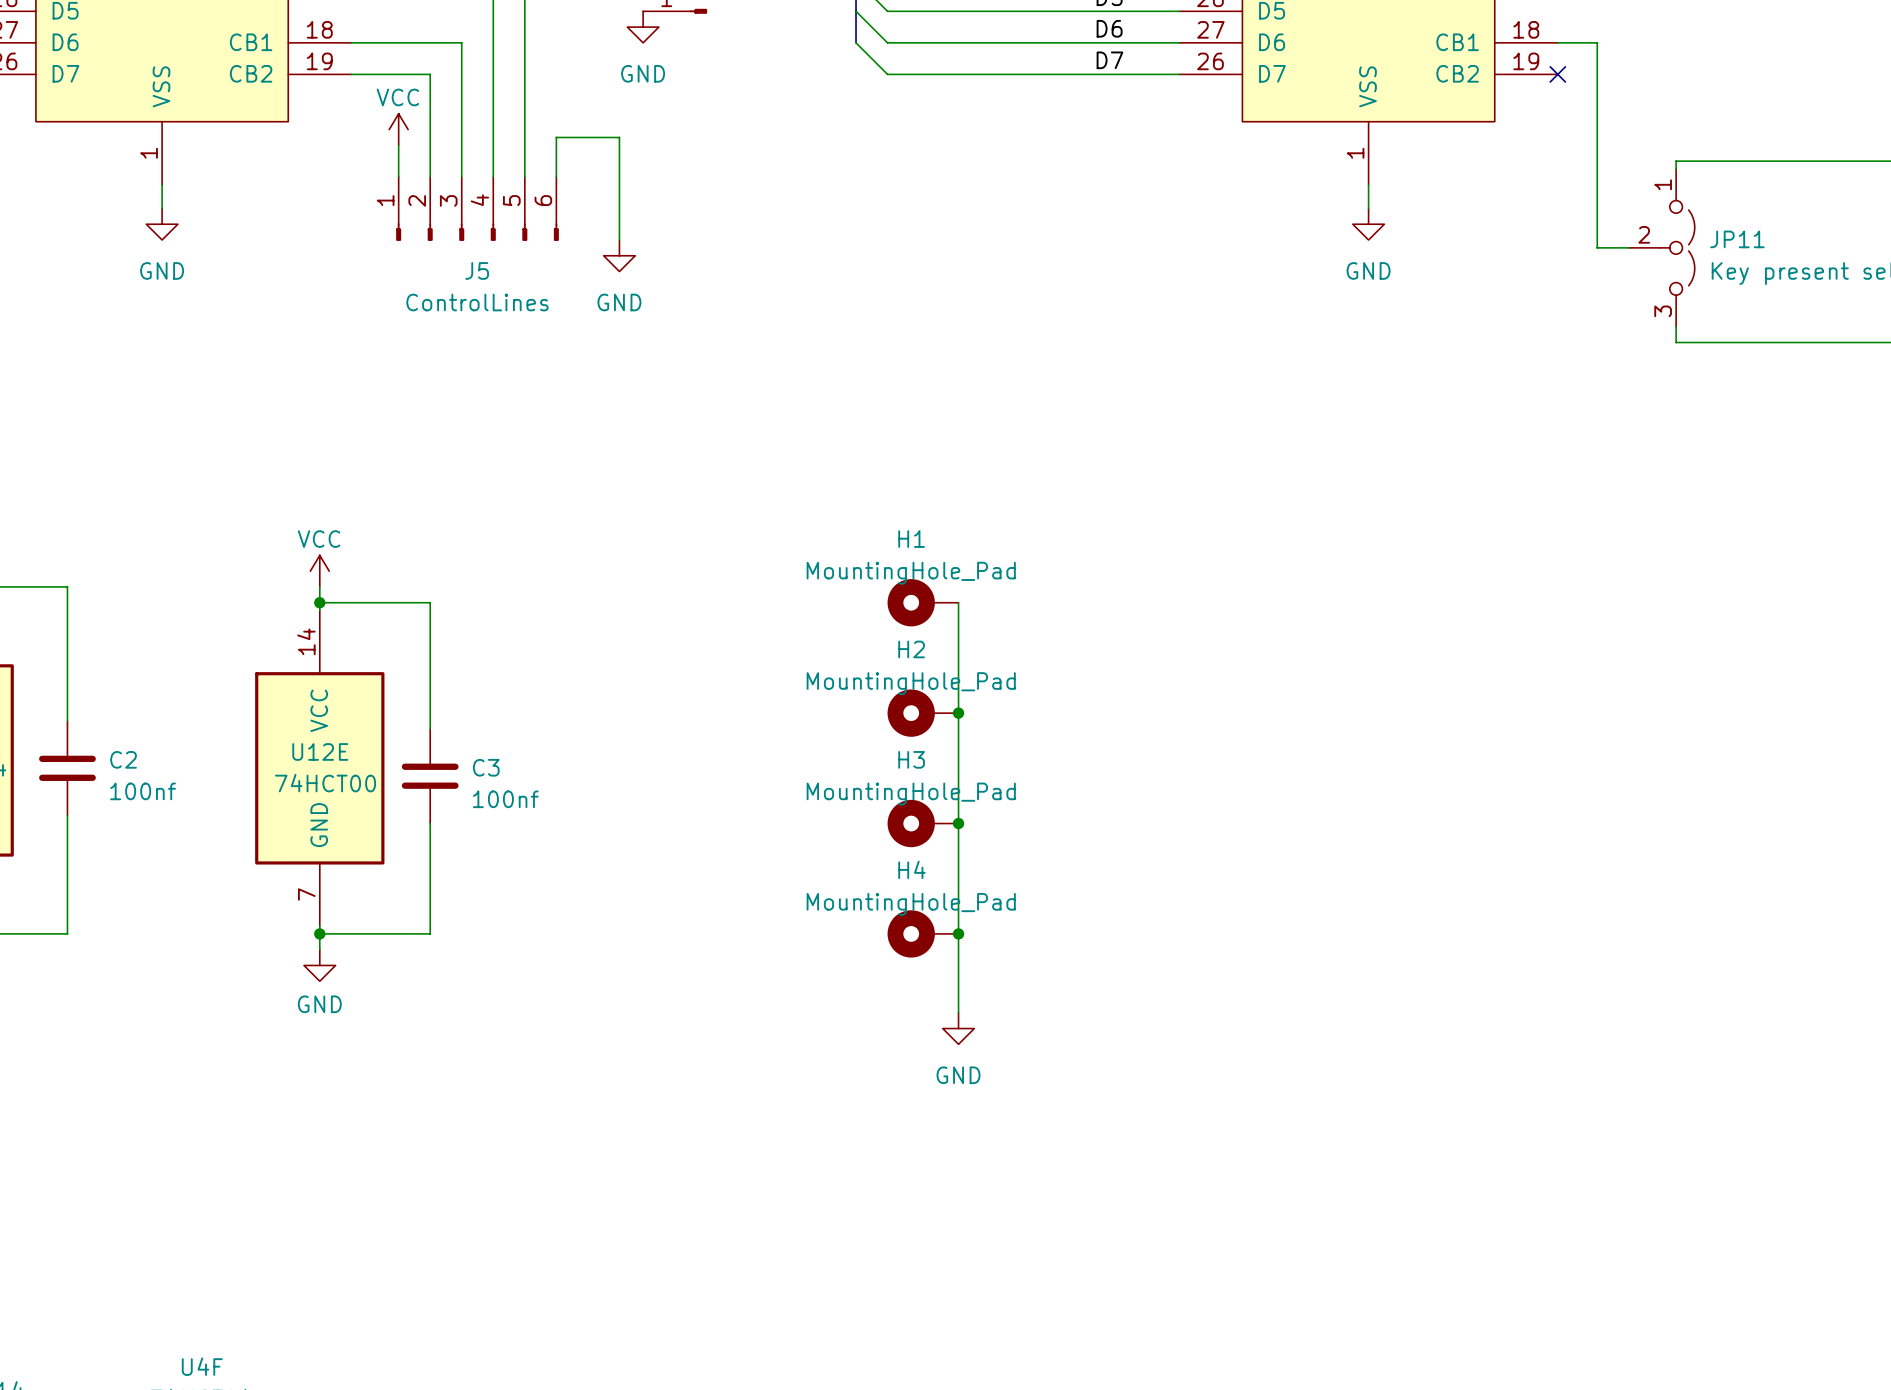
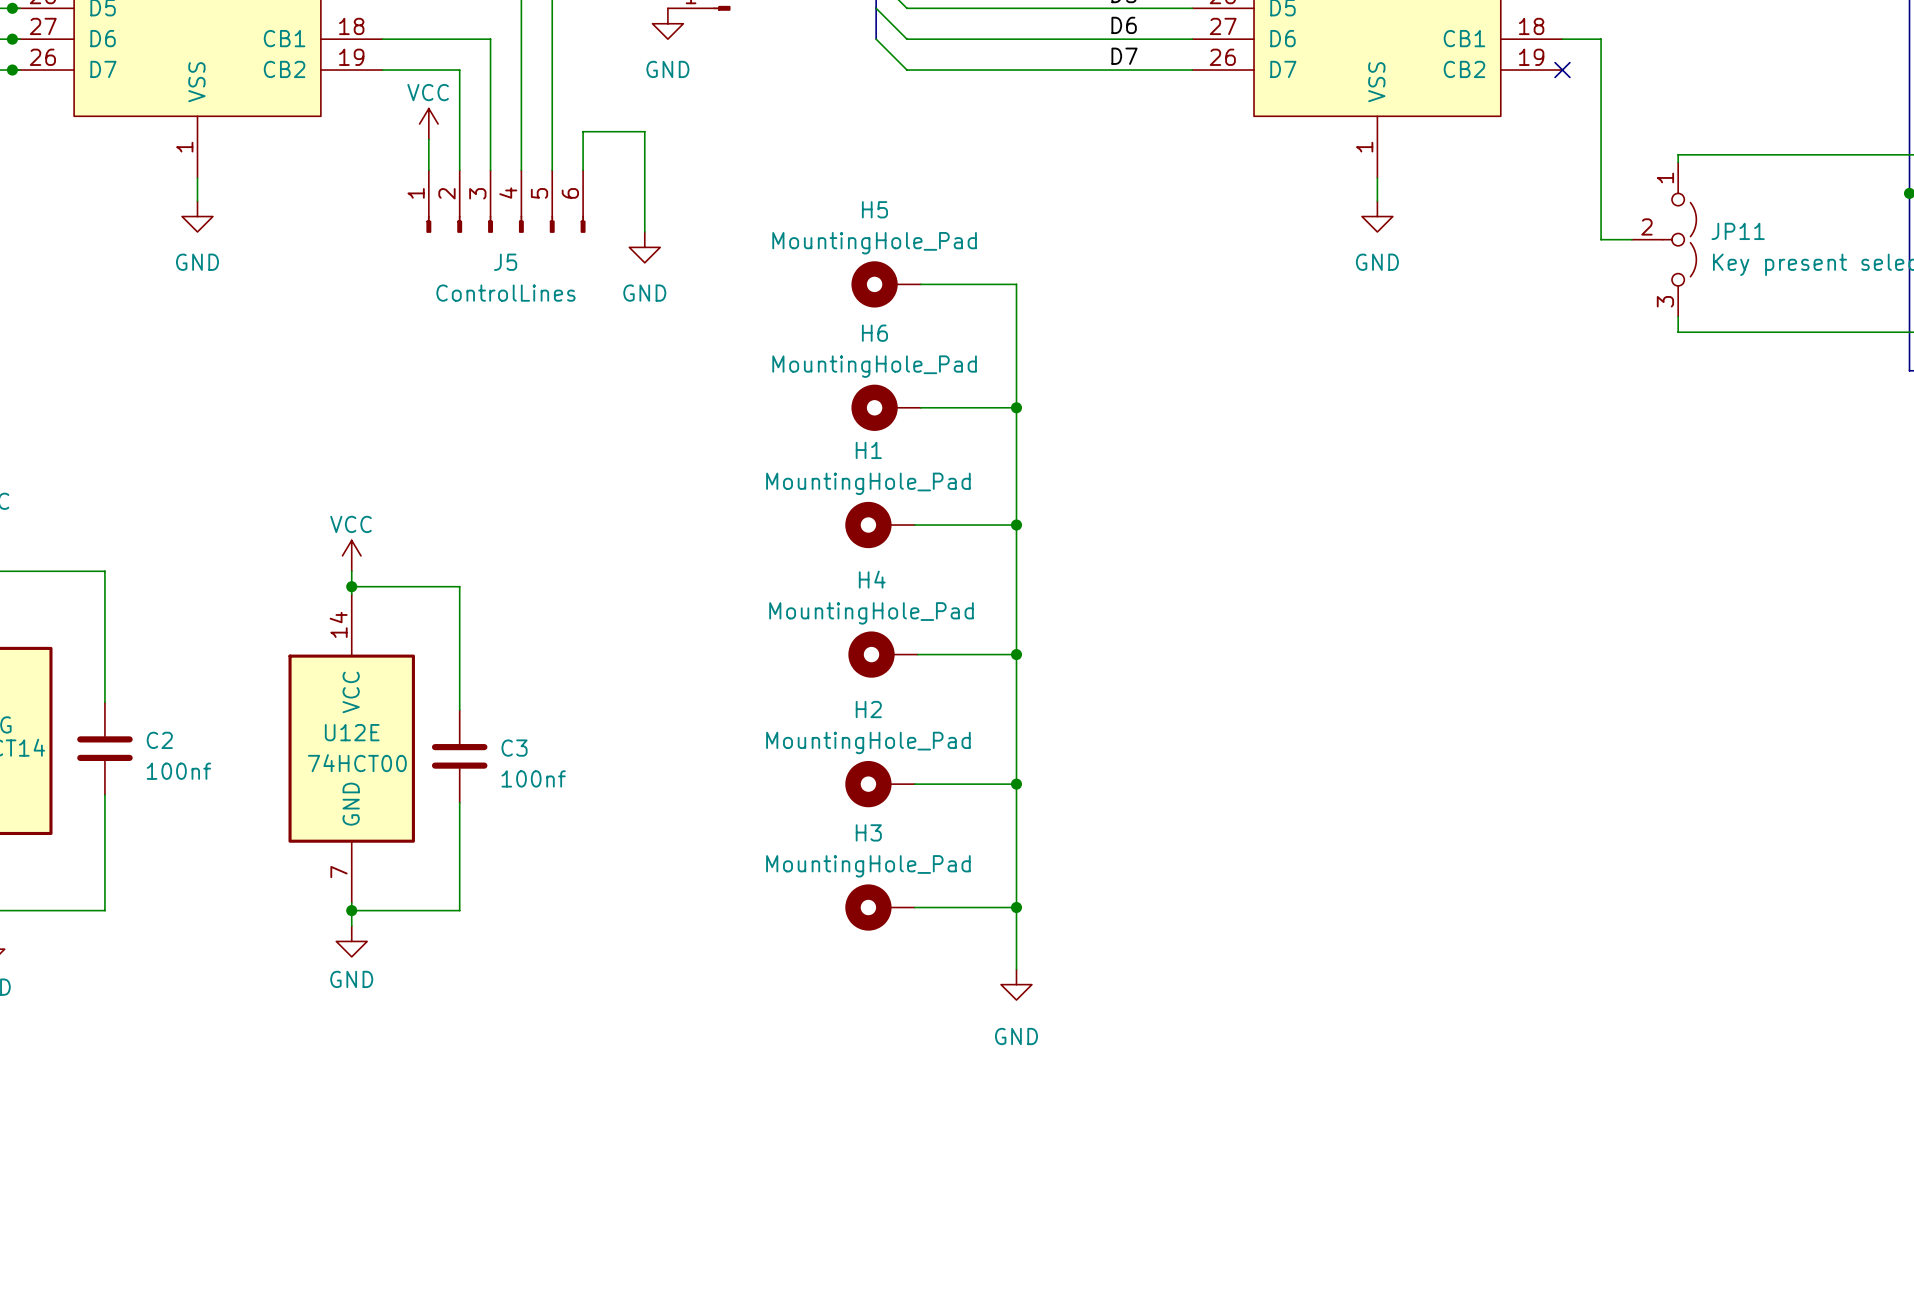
H5: none -> MountingHole_Pad (886, 284)
wire: none -> (920, 284) (1016, 284) (1016, 969)
H6: none -> MountingHole_Pad (886, 407)
wire: none -> (920, 407) (1016, 407)
junction: none -> (1016, 407)
wire: none -> (914, 525) (1016, 525)
H1 name position: H1 (911, 539) -> H1 (868, 450)
junction: none -> (1016, 525)
H1 value position: MountingHole_Pad (911, 573) -> MountingHole_Pad (868, 483)
H1 position: (923, 602) -> (879, 525)
wire: (958, 602) (958, 1012) -> none
H2 name position: H2 (911, 649) -> H2 (868, 709)
wire: none -> (917, 654) (1016, 654)
junction: none -> (1016, 654)
H2 value position: MountingHole_Pad (911, 683) -> MountingHole_Pad (868, 742)
H2 position: (923, 713) -> (879, 784)
junction: (958, 713) -> none
H3 name position: H3 (911, 759) -> H3 (868, 832)
H3 value position: MountingHole_Pad (911, 794) -> MountingHole_Pad (868, 866)
wire: none -> (914, 784) (1016, 784)
H3 position: (923, 823) -> (879, 907)
junction position: (958, 823) -> (1016, 784)
H4 name position: H4 (911, 869) -> H4 (872, 579)
H4 value position: MountingHole_Pad (911, 904) -> MountingHole_Pad (871, 613)
wire: none -> (914, 907) (1016, 907)
H4 position: (923, 933) -> (883, 654)
junction position: (958, 933) -> (1016, 907)
power symbol position: GND (958, 1028) -> GND (1016, 984)
power symbol text position: GND (958, 1075) -> GND (1016, 1036)

